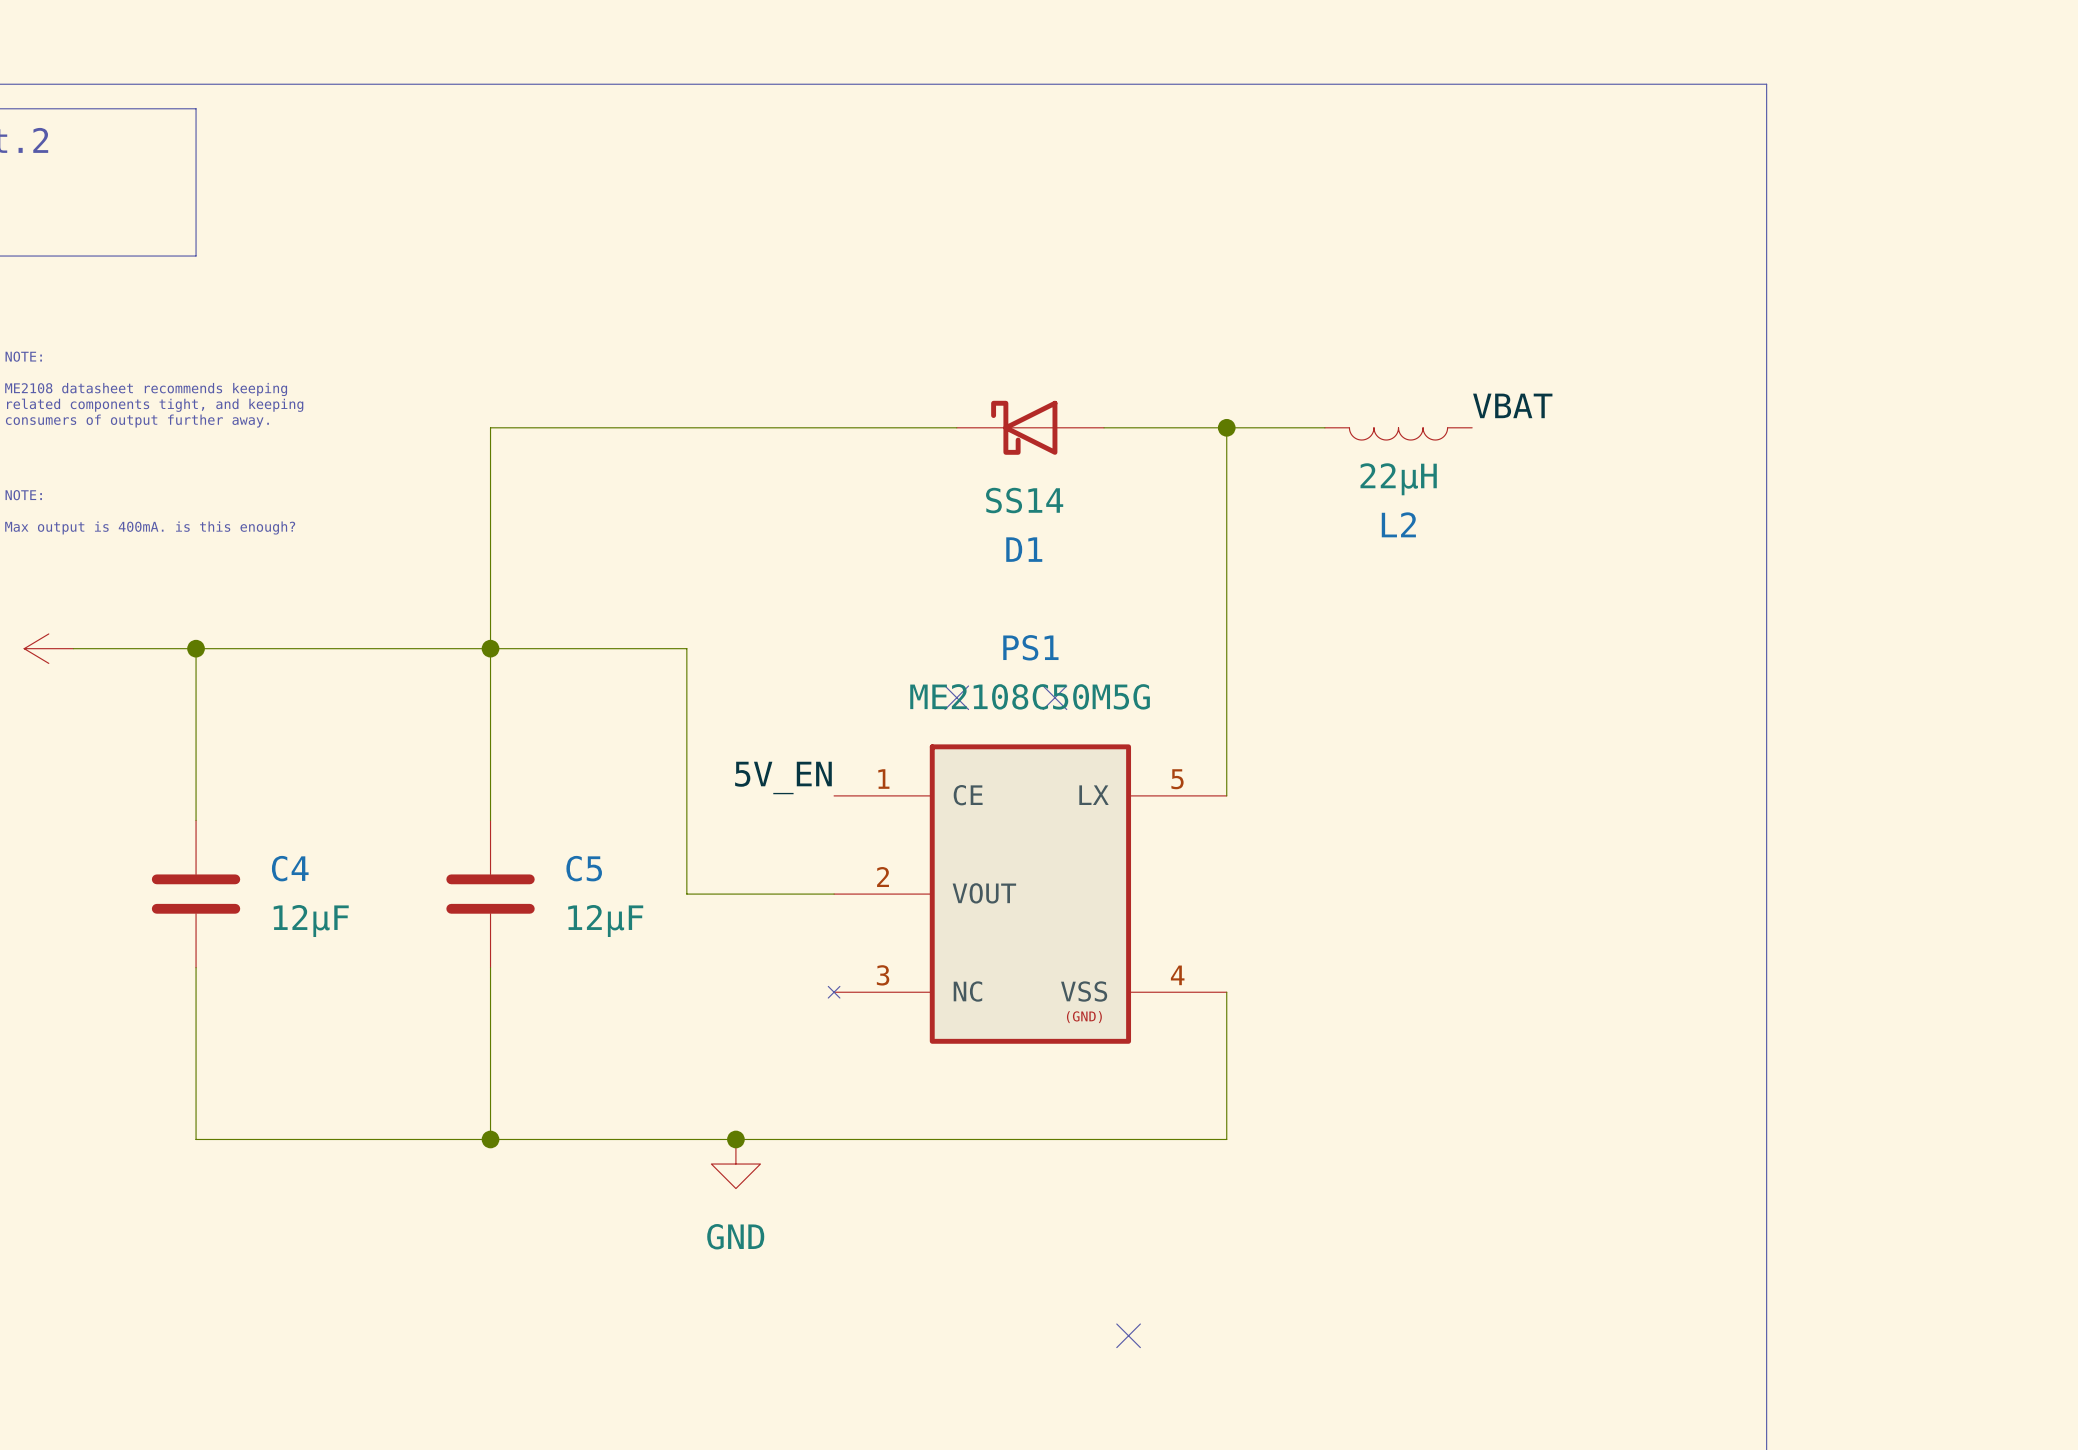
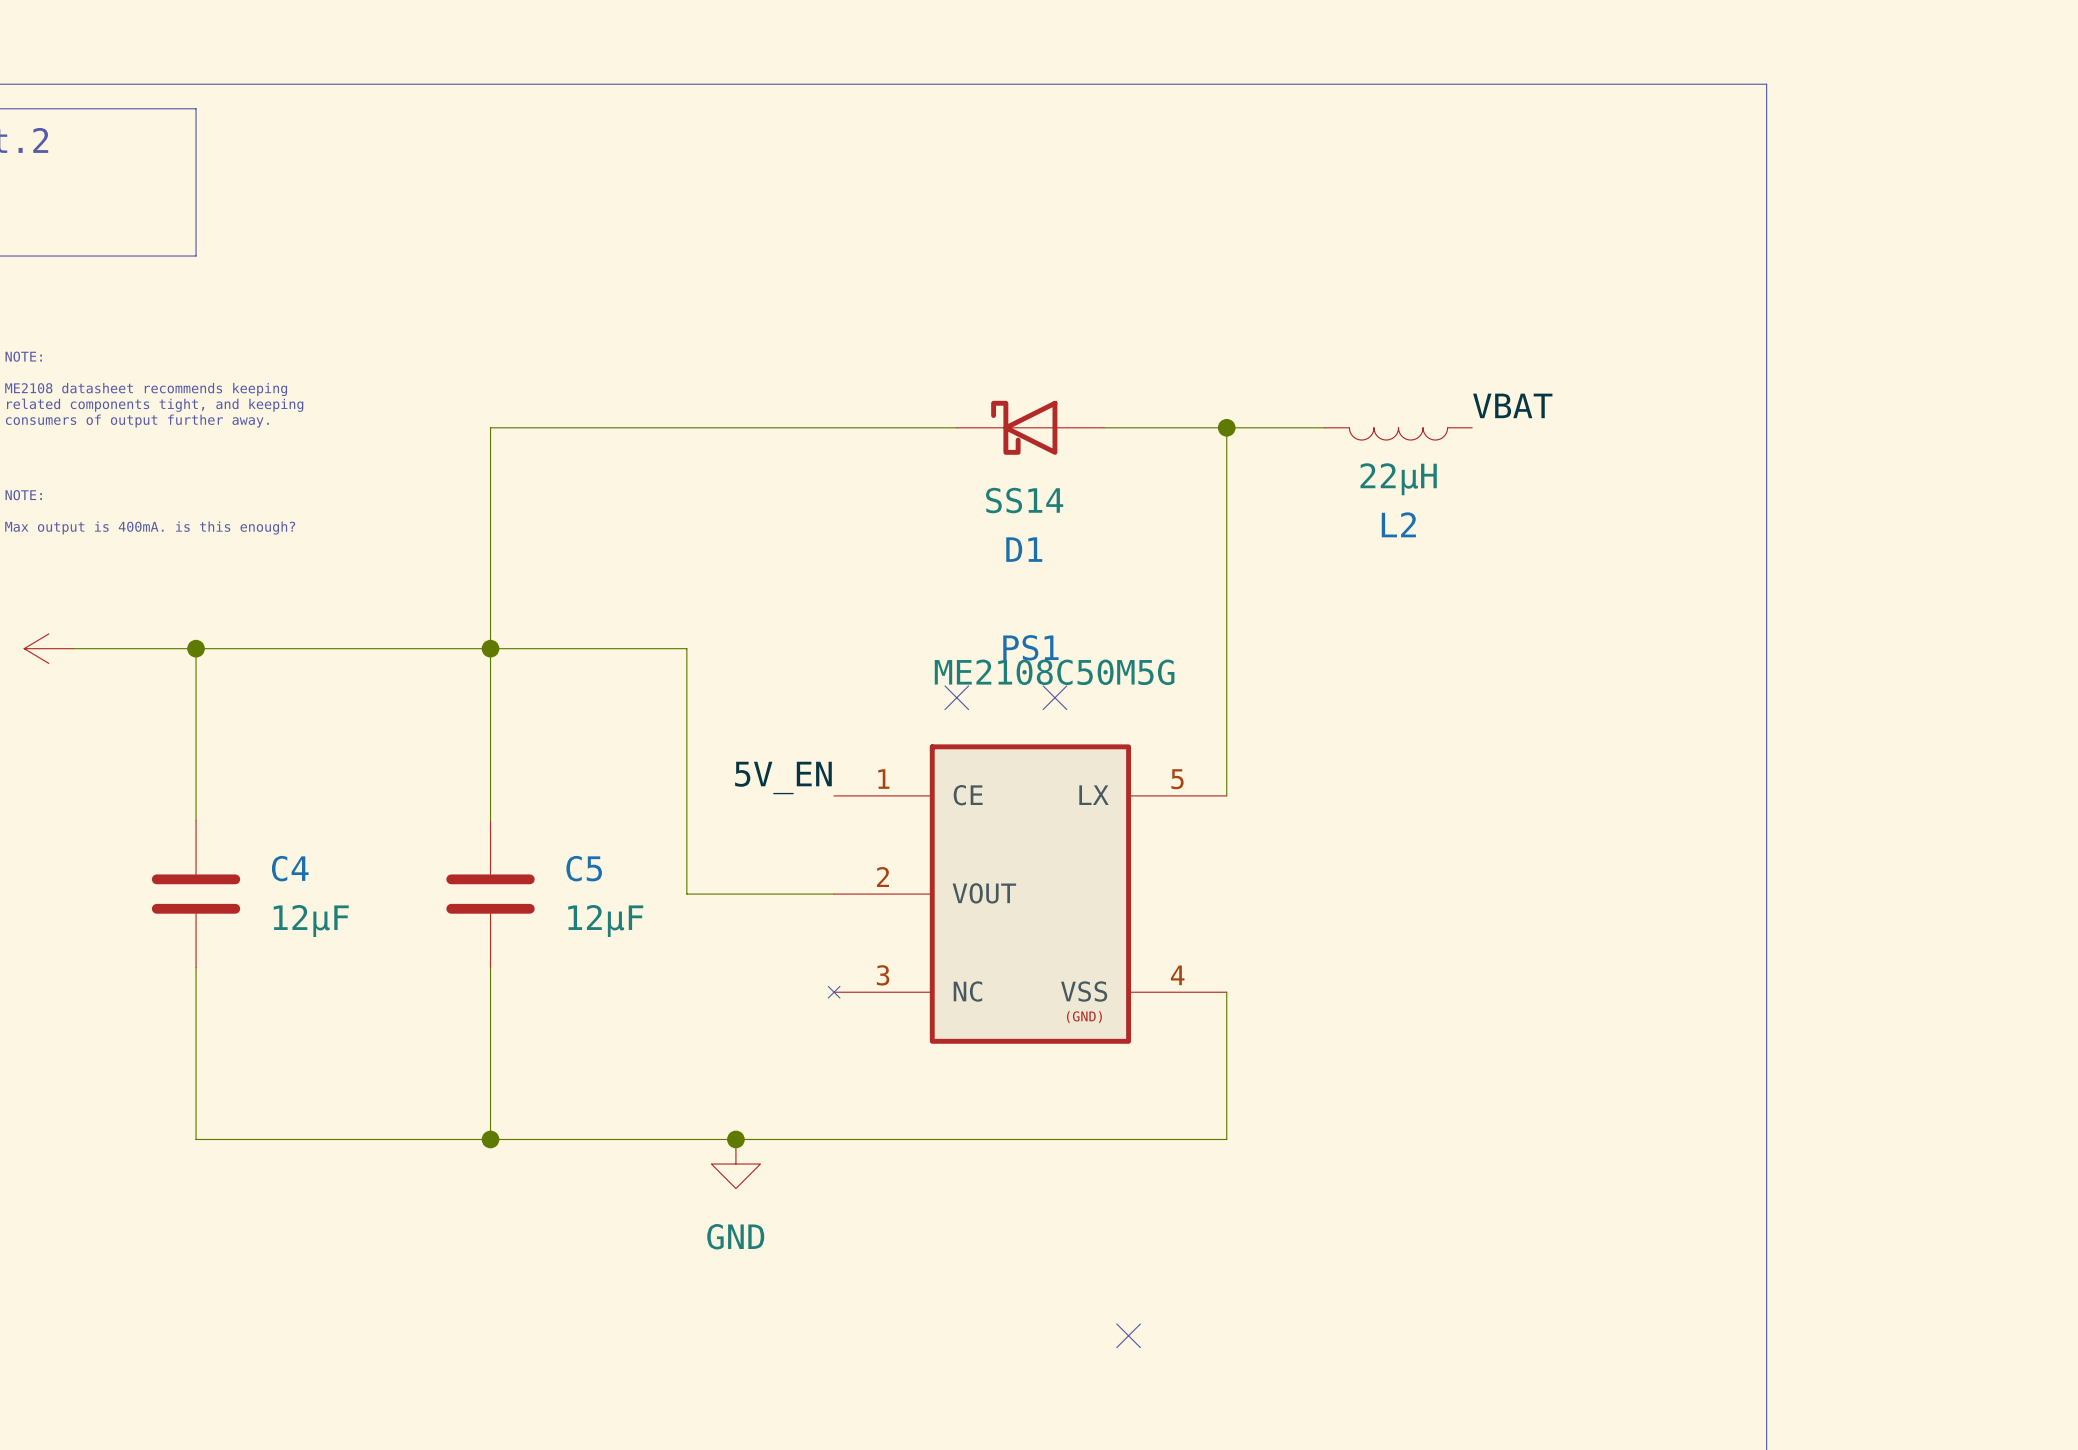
PS1 value position: ME2108C50M5G (1030, 696) -> ME2108C50M5G (1054, 672)

